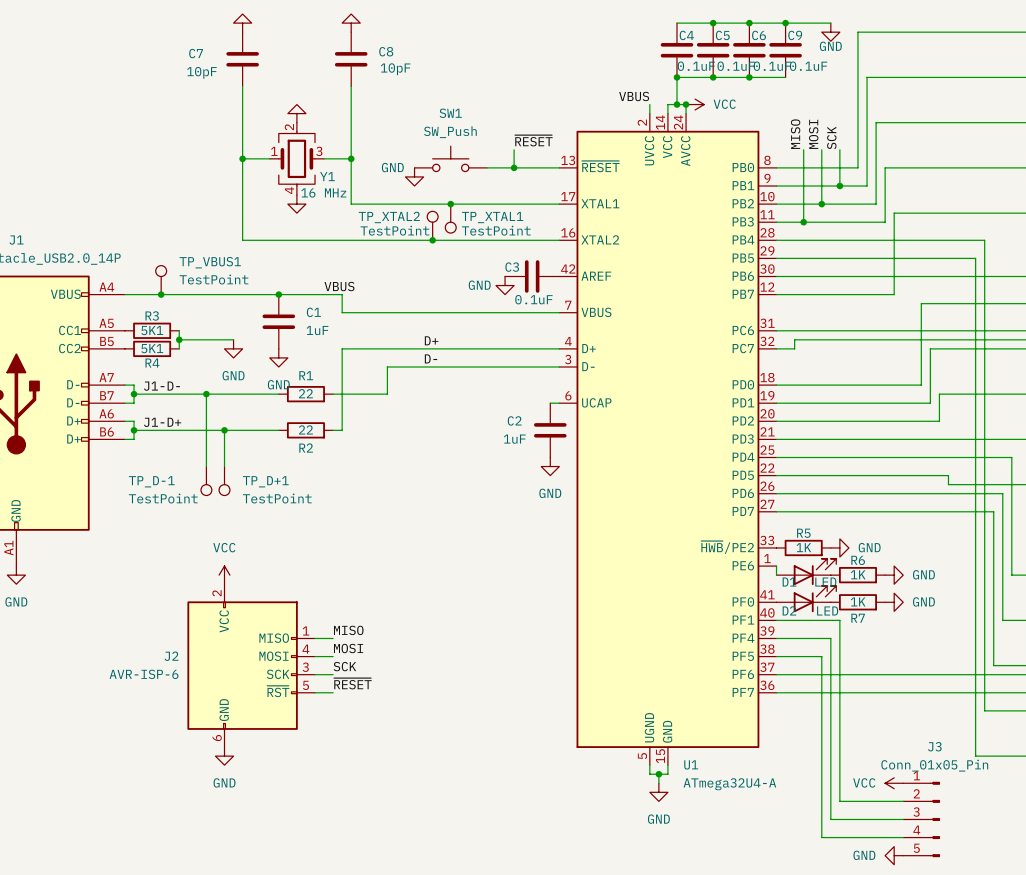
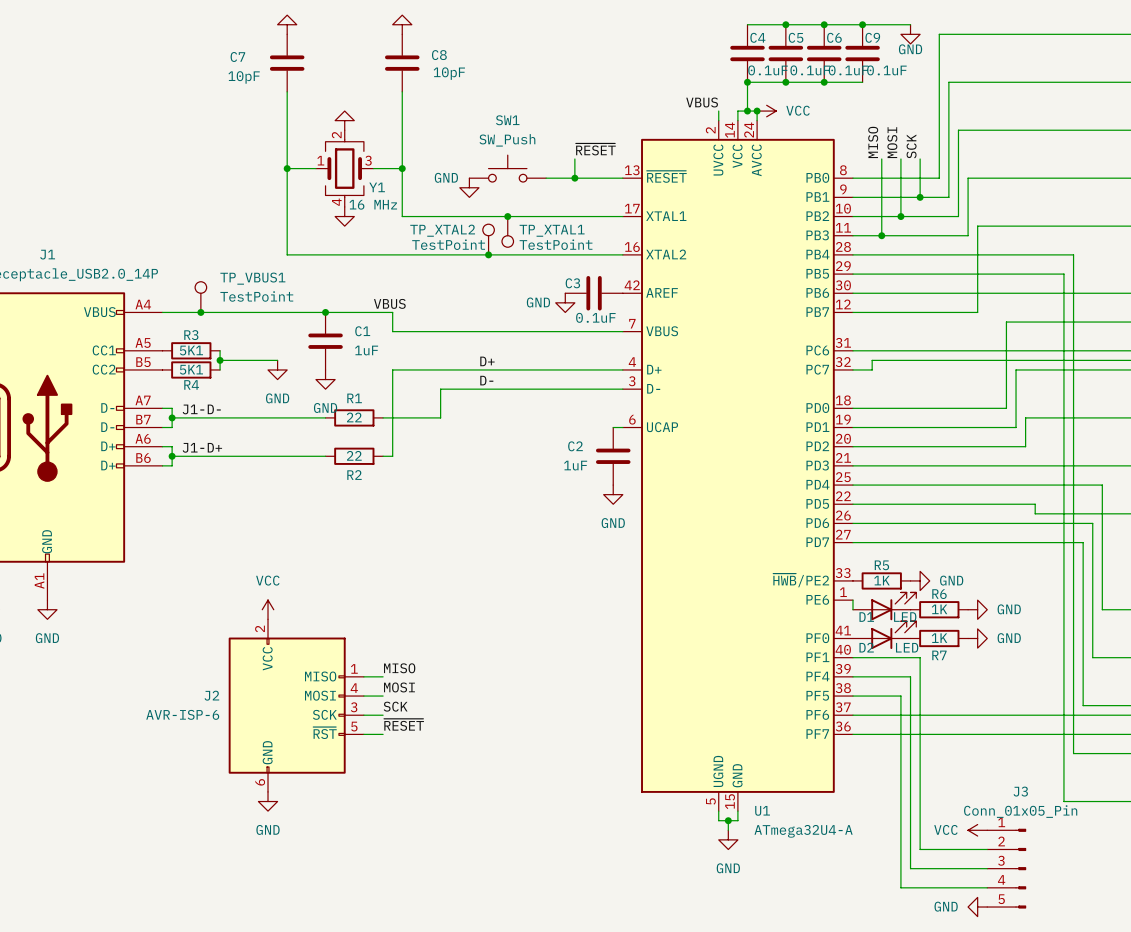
wire: (206, 394) (206, 466) -> none
junction: (206, 394) -> none
wire: (224, 430) (224, 466) -> none
junction: (224, 430) -> none
TP_D-1: TestPoint (206, 481) -> none
TP_D+1: TestPoint (224, 481) -> none

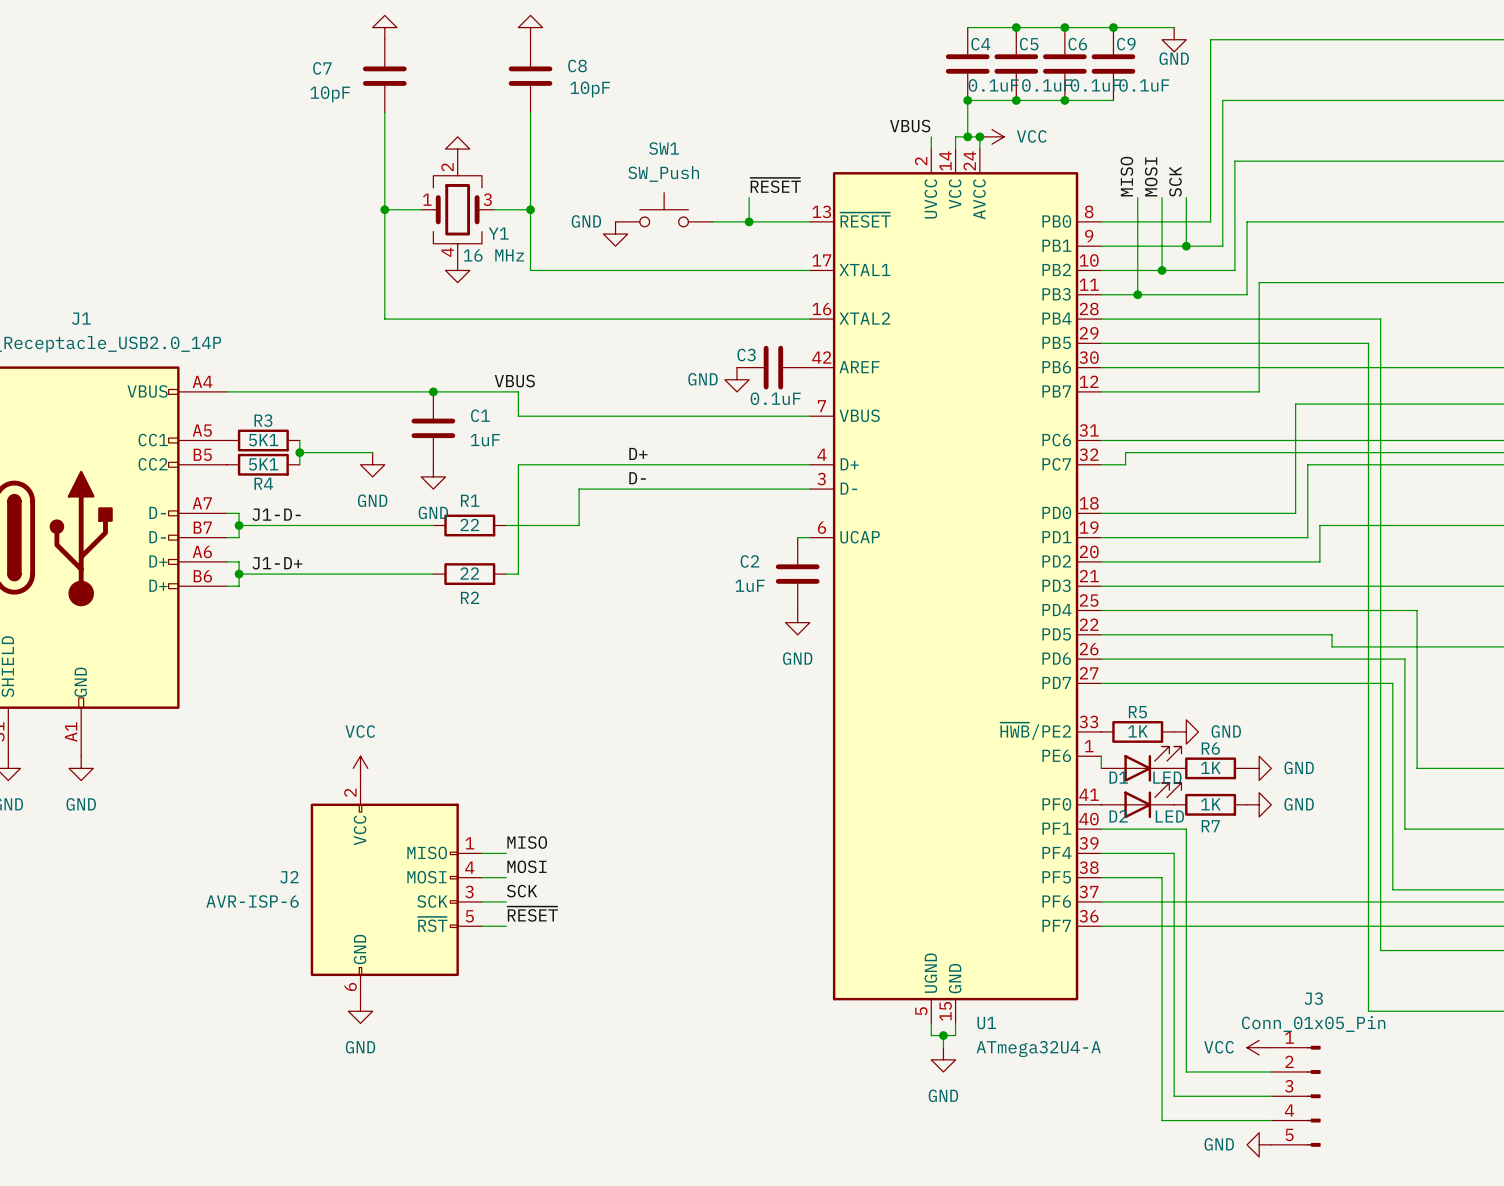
junction: (507, 216) -> none
TP_XTAL1: TestPoint (507, 231) -> none
TP_XTAL2: TestPoint (488, 239) -> none
junction: (488, 254) -> none
TP_VBUS1: TestPoint (200, 297) -> none
junction: (200, 312) -> none

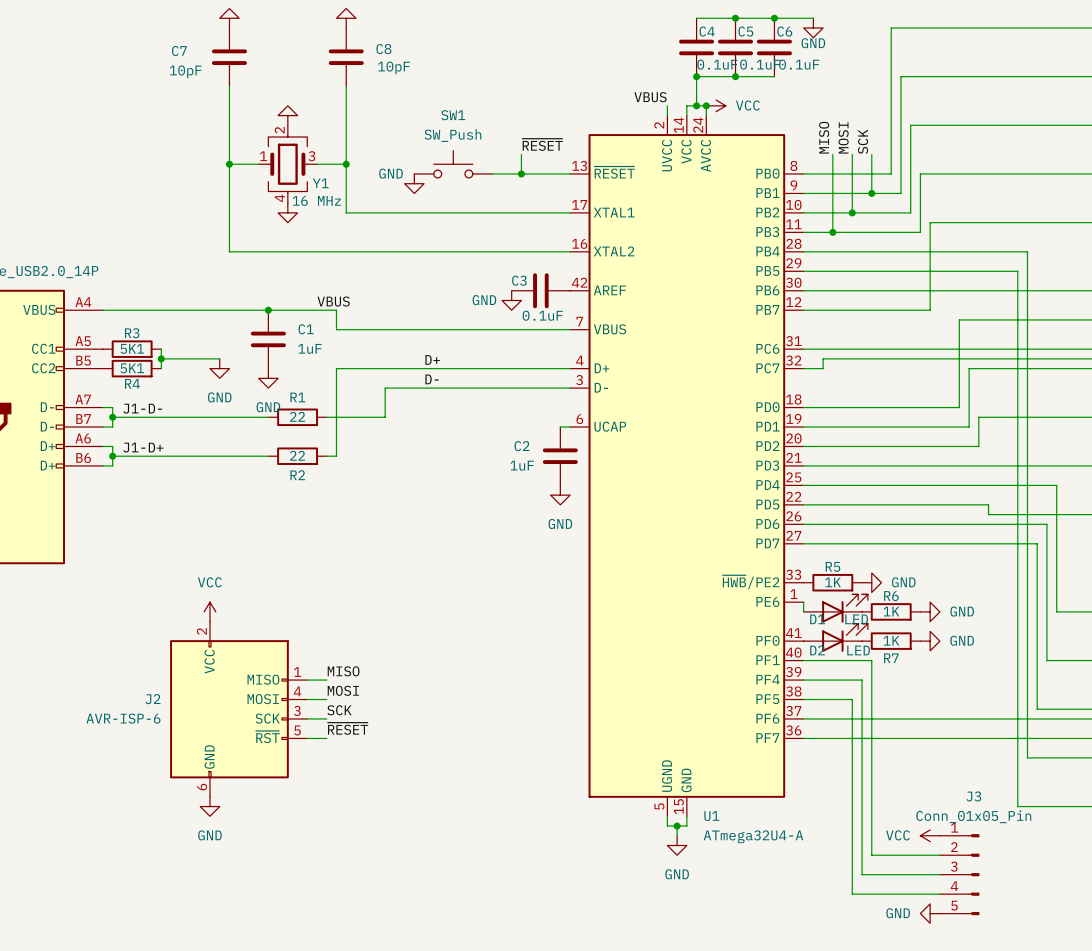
wire: (1113, 27) (1174, 27) -> none
junction: (1113, 27) -> none
power symbol position: GND (1174, 39) -> GND (813, 28)
C9: 0.1uF (1113, 64) -> none
wire: (1064, 100) (1113, 100) -> none
junction: (1064, 100) -> none

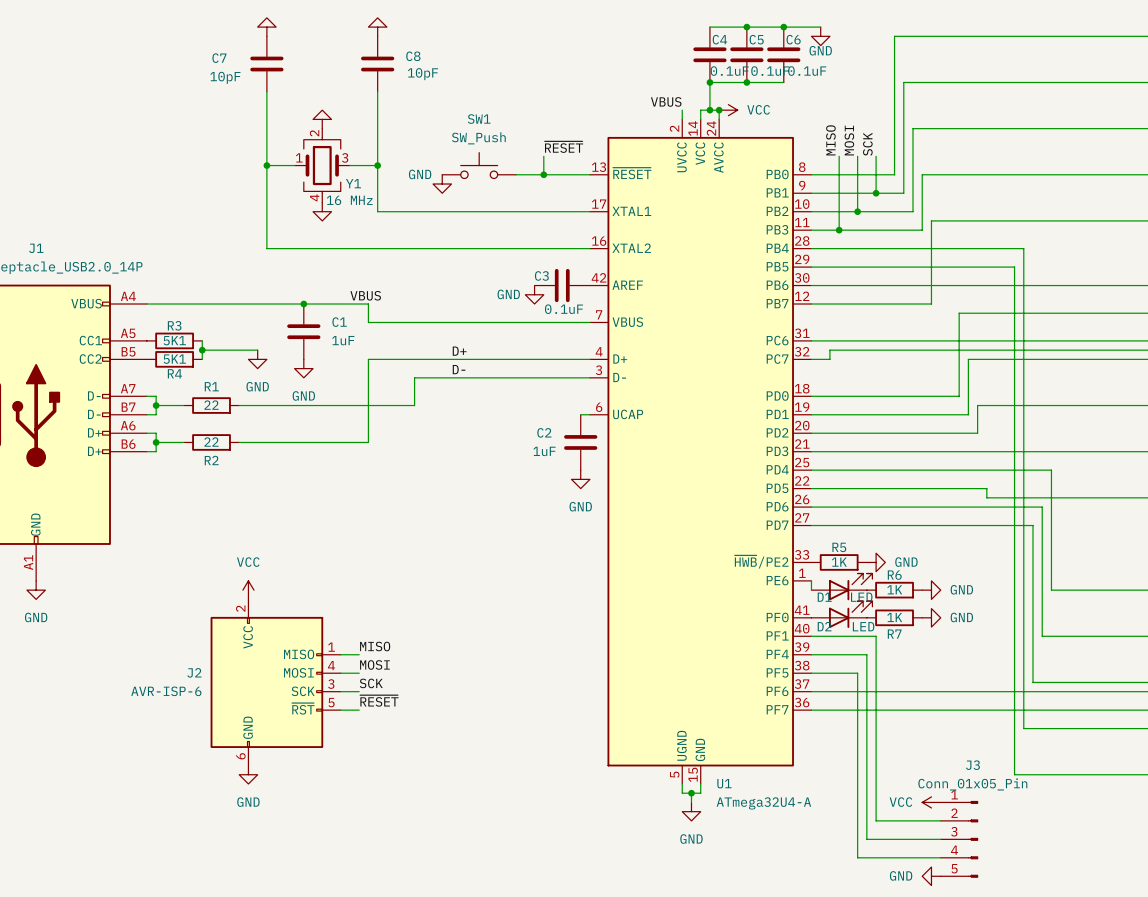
label: J1-D- (142, 408) -> none
wire: (141, 417) (200, 417) -> (303, 405) (359, 405)
R1 position: (297, 417) -> (211, 405)
label: J1-D+ (143, 447) -> none
wire: (141, 456) (200, 456) -> (303, 442) (359, 442)
R2 position: (297, 456) -> (211, 442)

